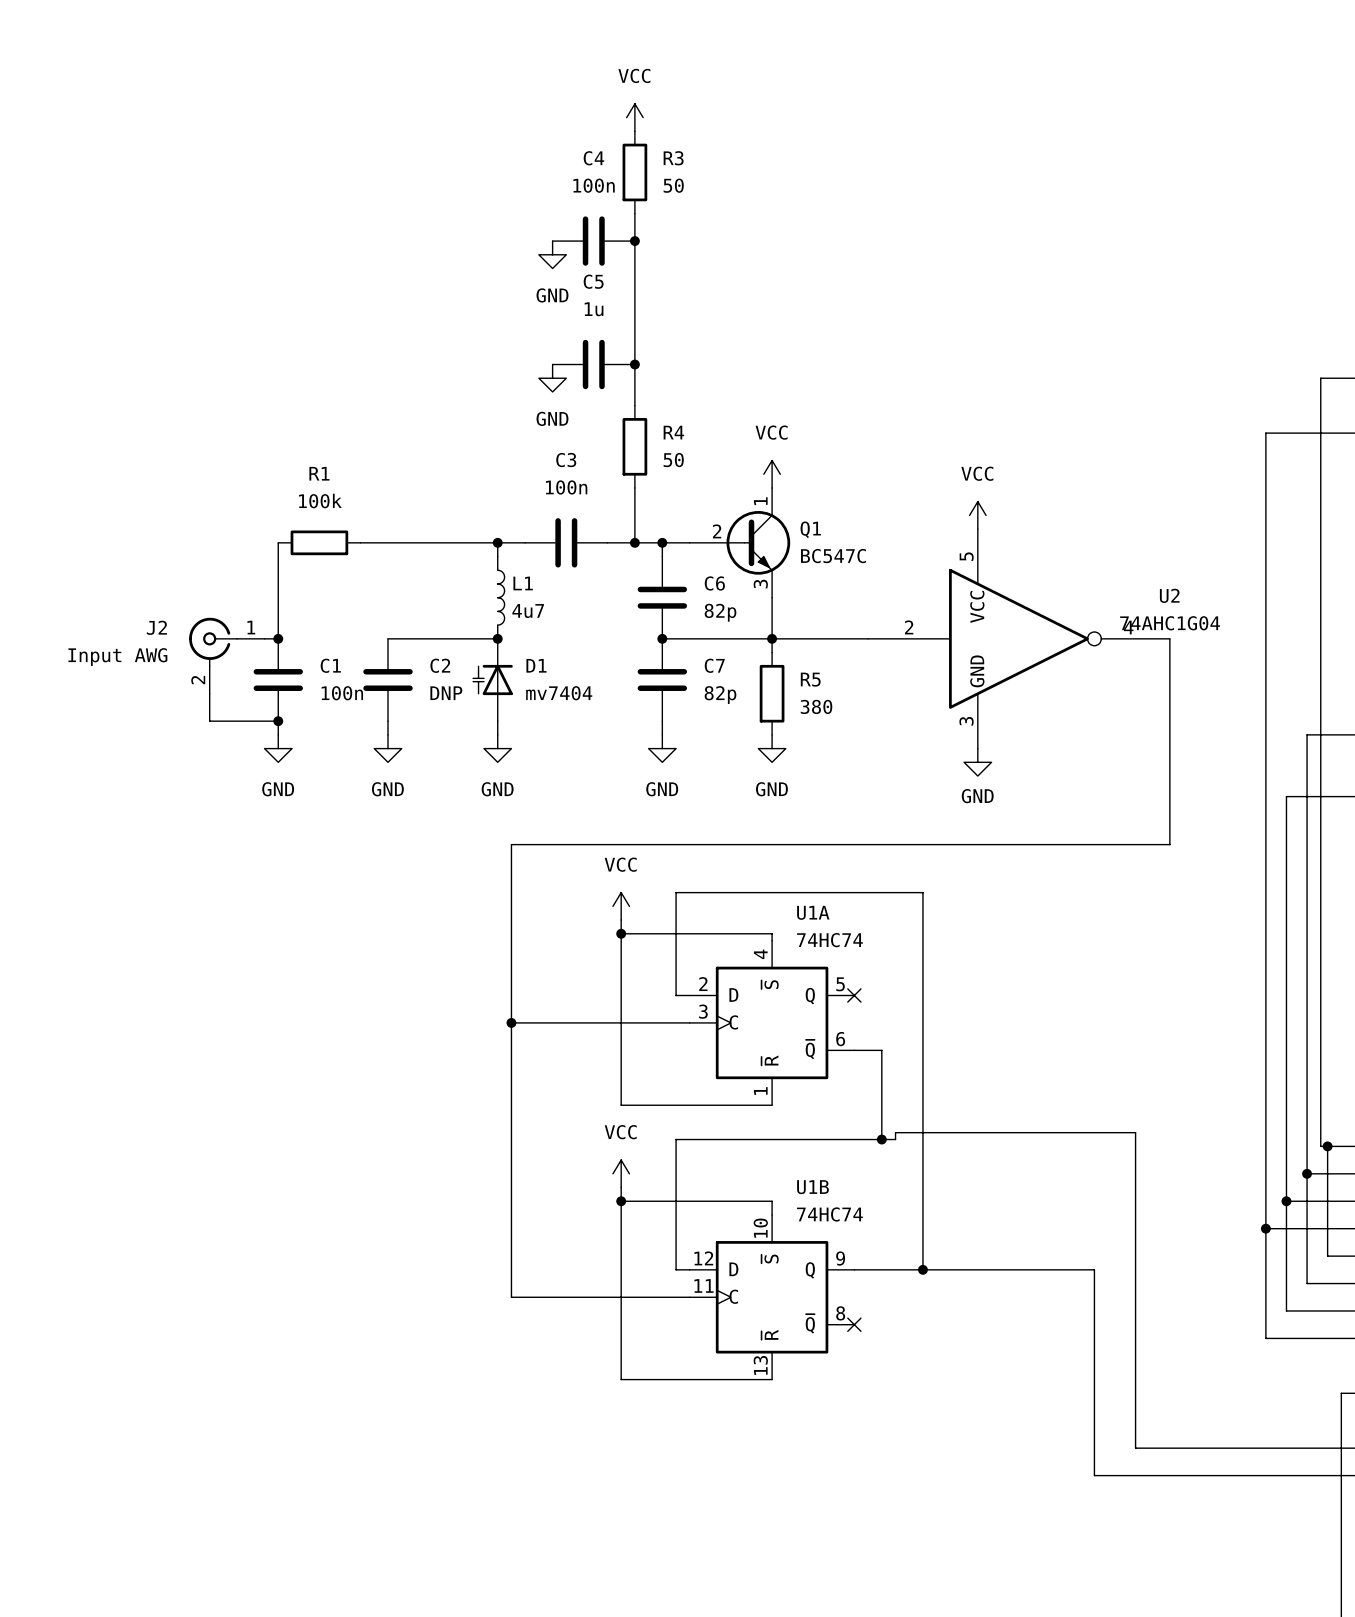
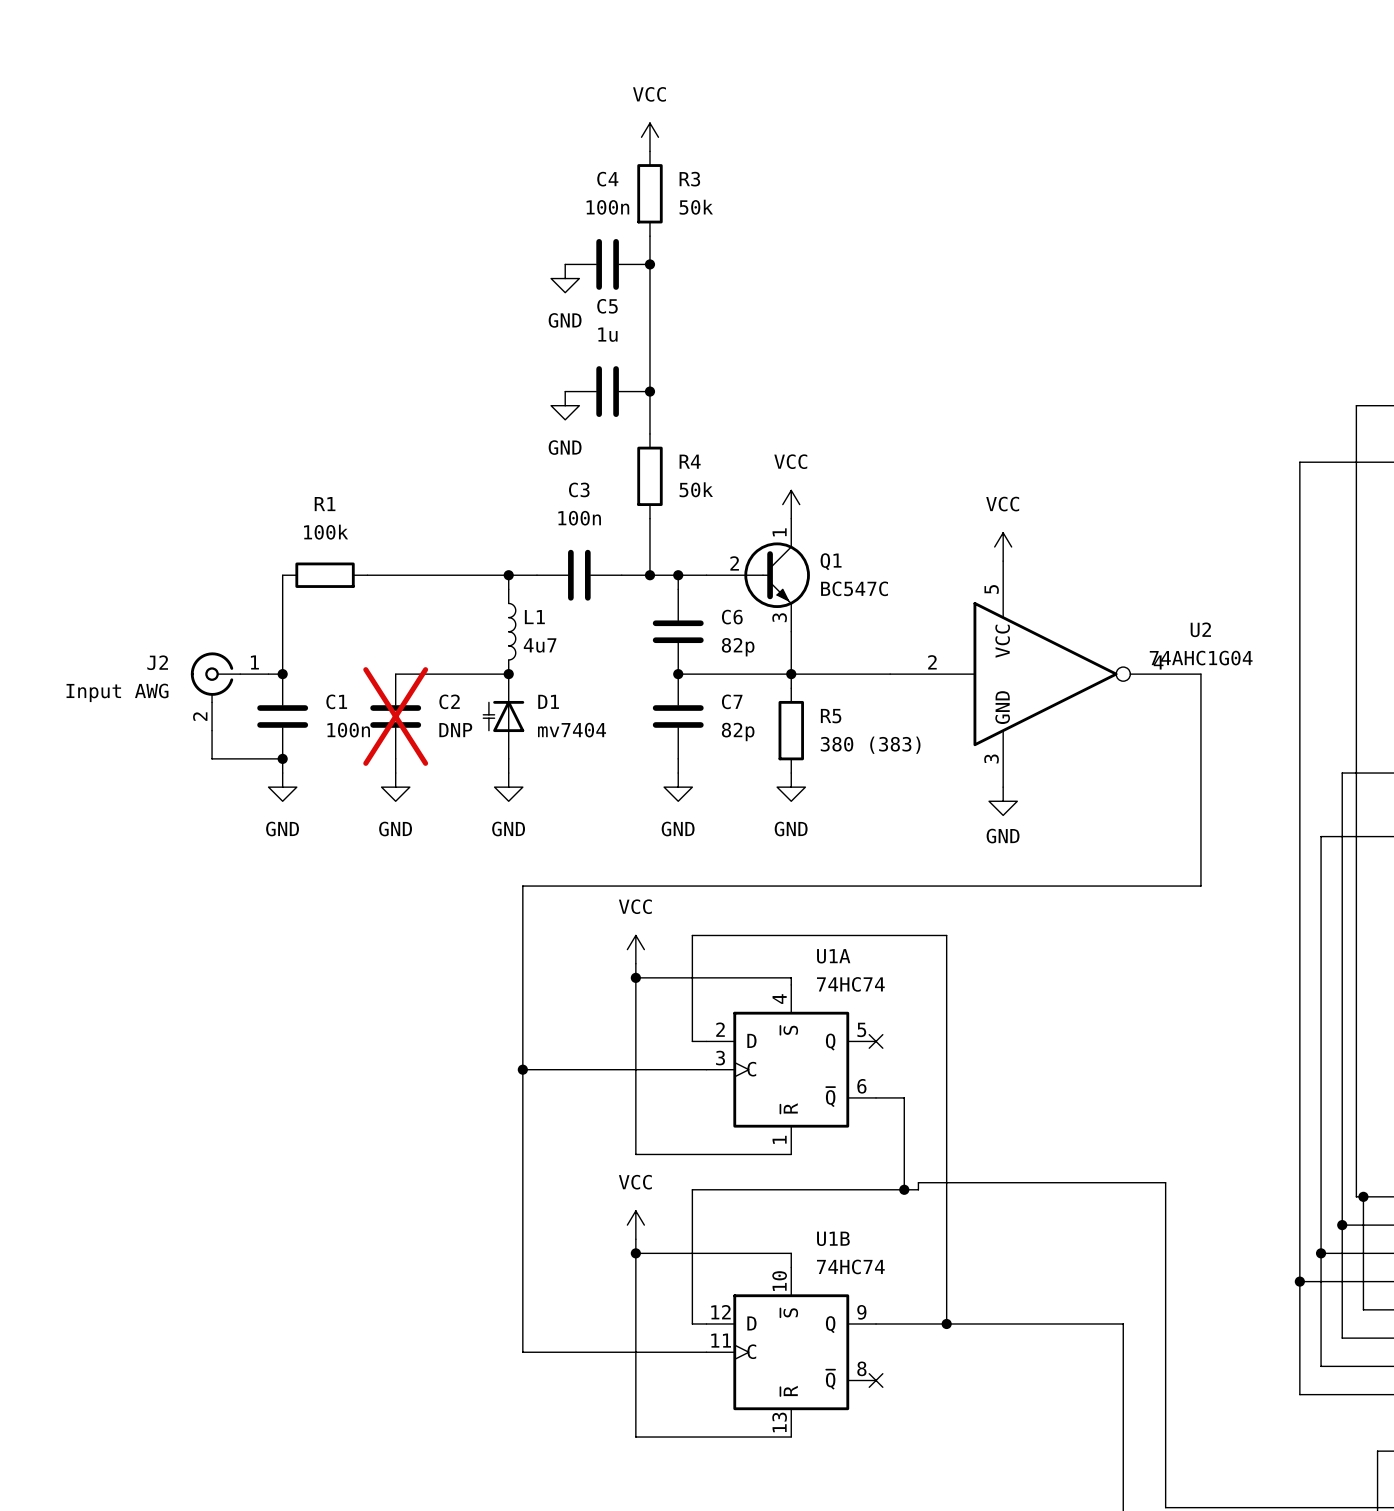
R3 value: 50 (673, 185) -> 50k (696, 207)
R4 value: 50 (673, 460) -> 50k (696, 489)
C2 do-not-place cross: none -> (395, 716)
R5 value: 380 (816, 706) -> 380 (383) (870, 745)

